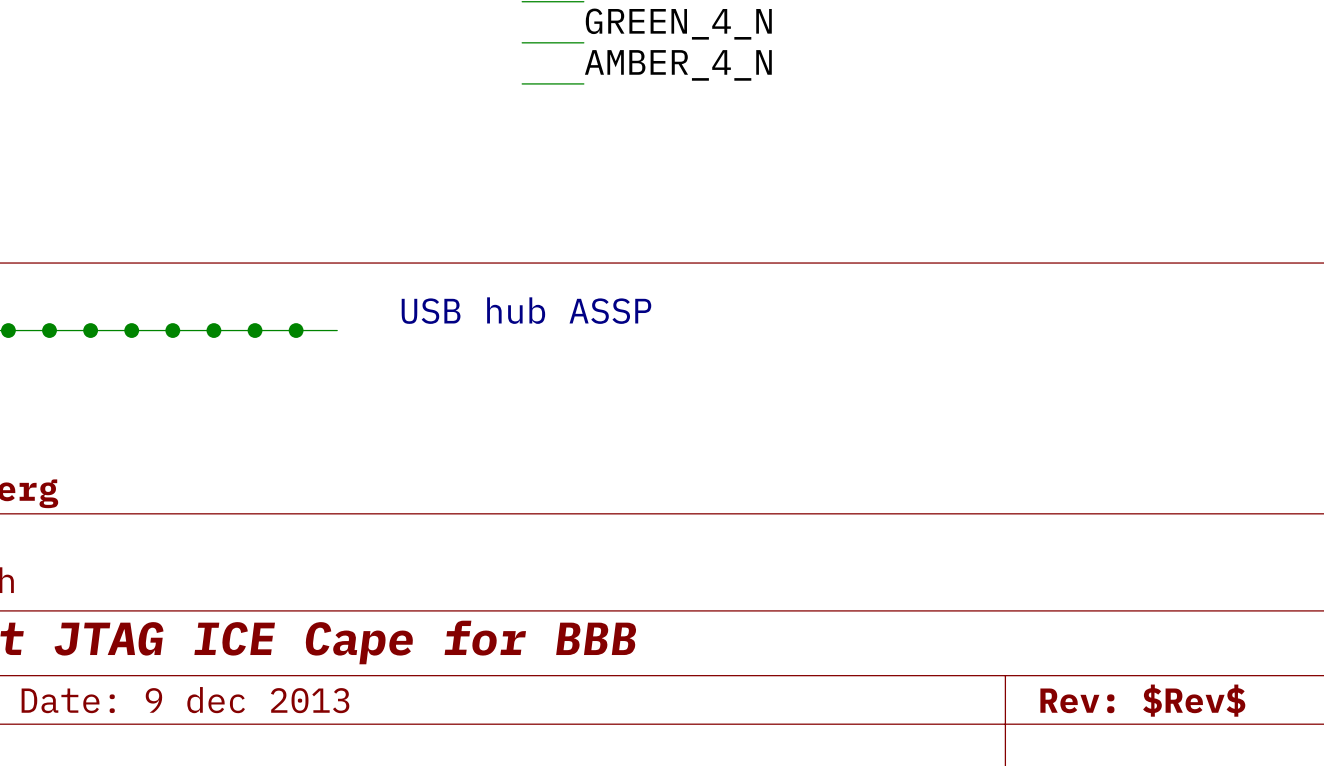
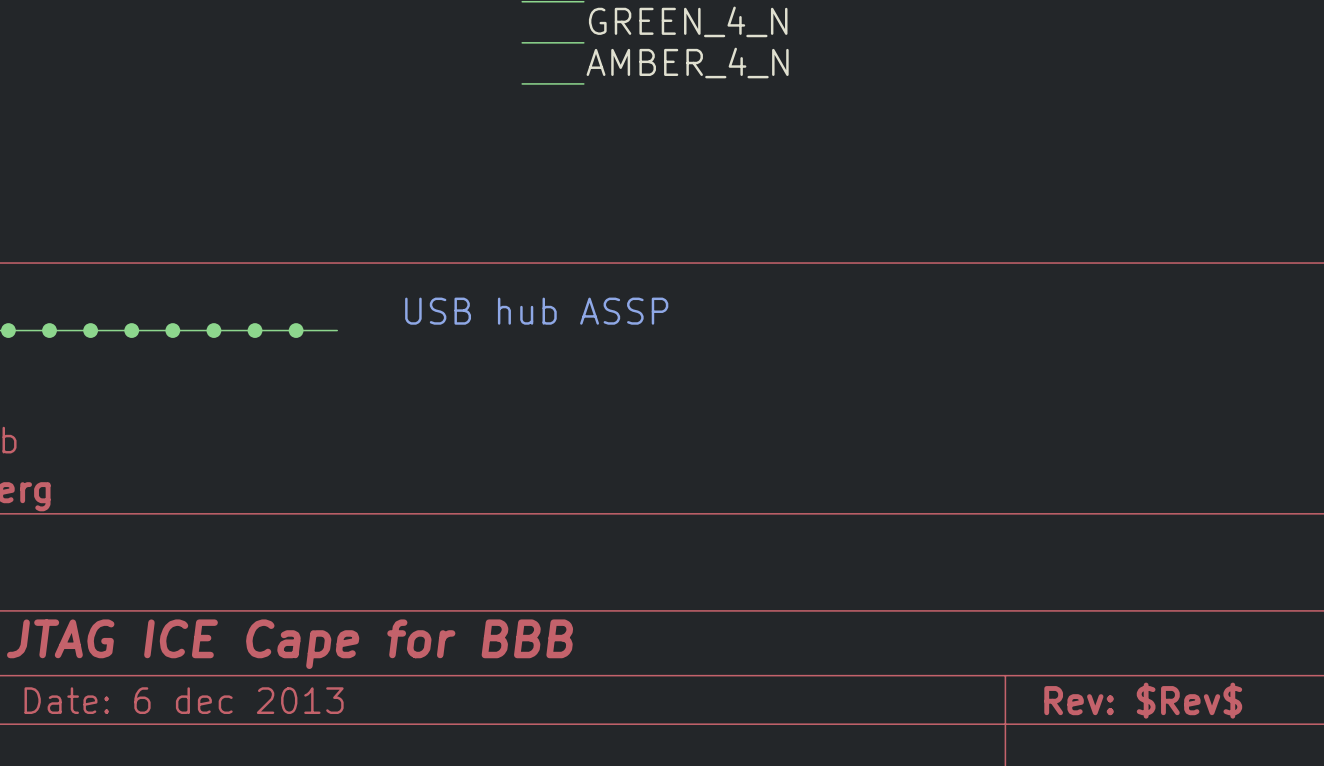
title block: Date: 9 dec 2013 (185, 700) -> Date: 6 dec 2013 (184, 700)

